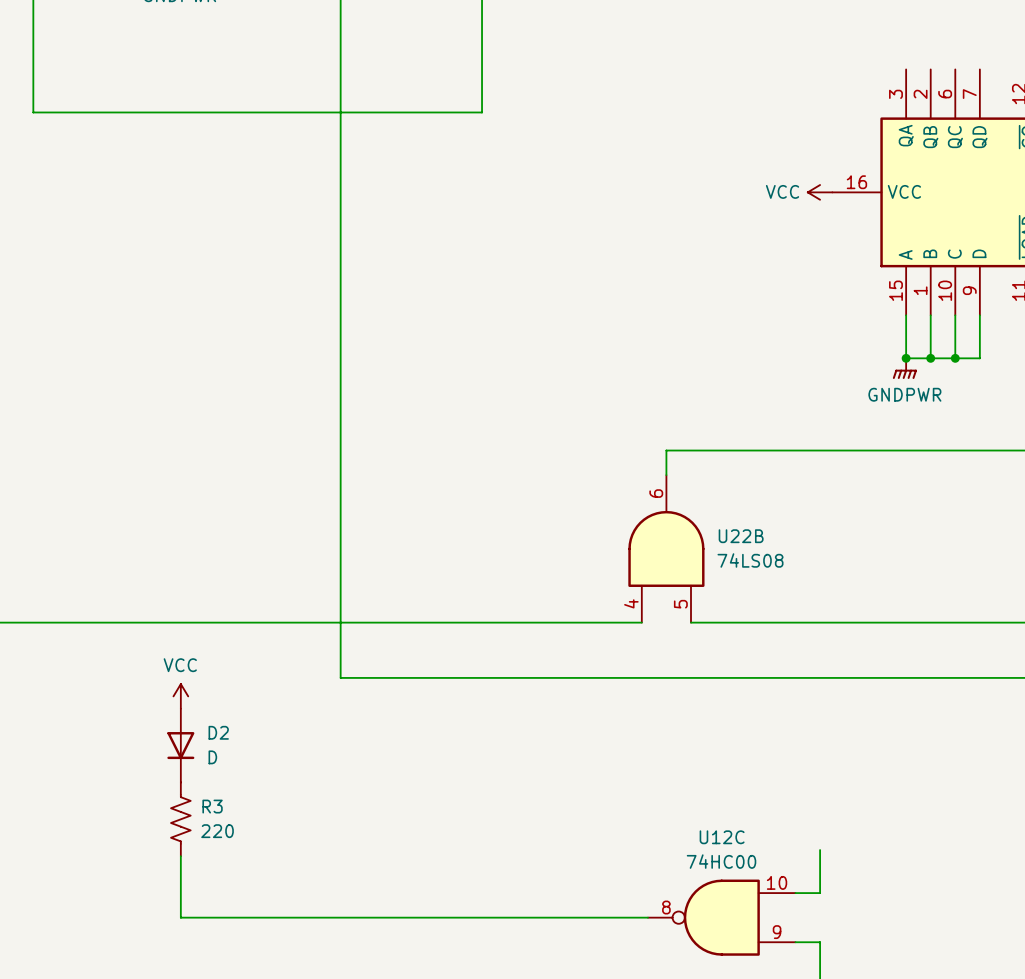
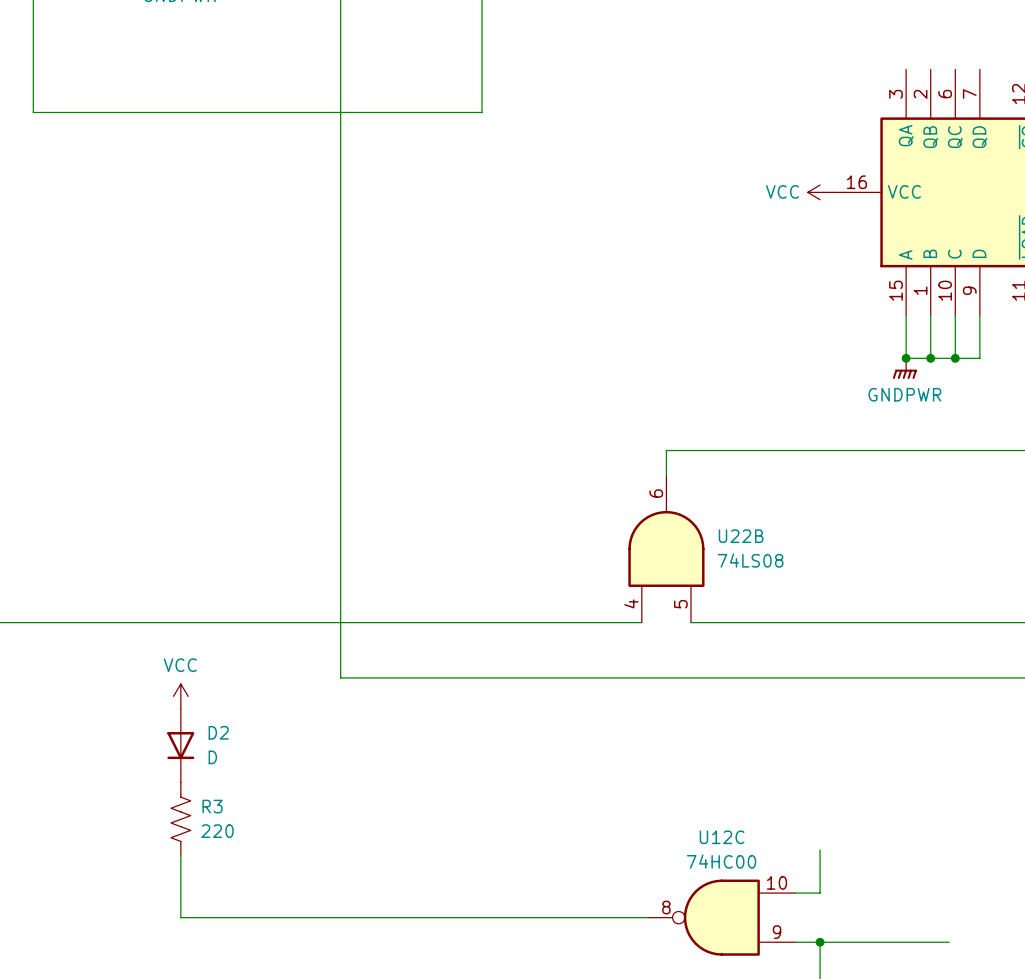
wire: none -> (820, 942) (949, 942)
junction: none -> (820, 942)

